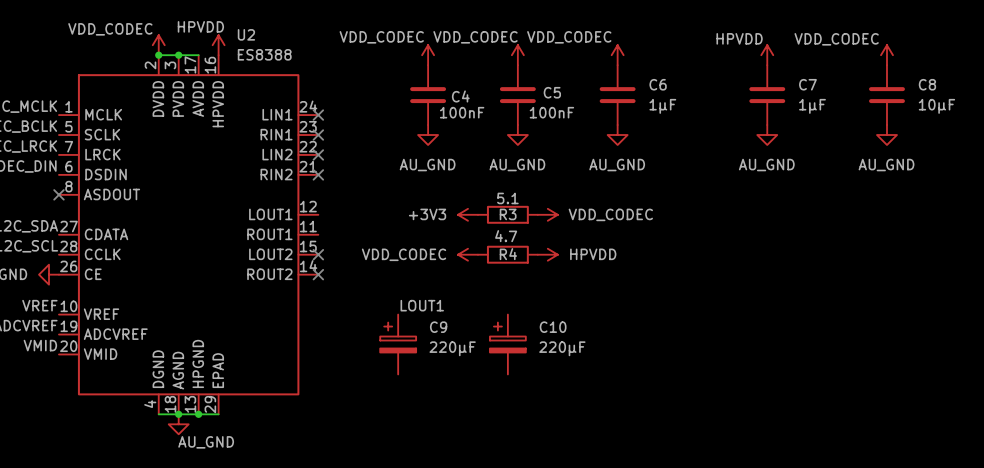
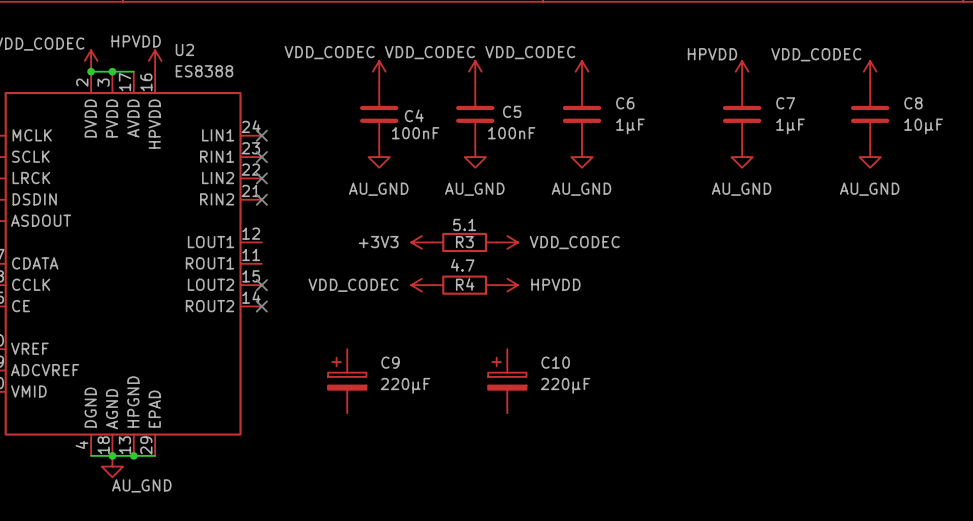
label: LOUT1 (422, 305) -> none
C10 position: (507, 344) -> (507, 381)

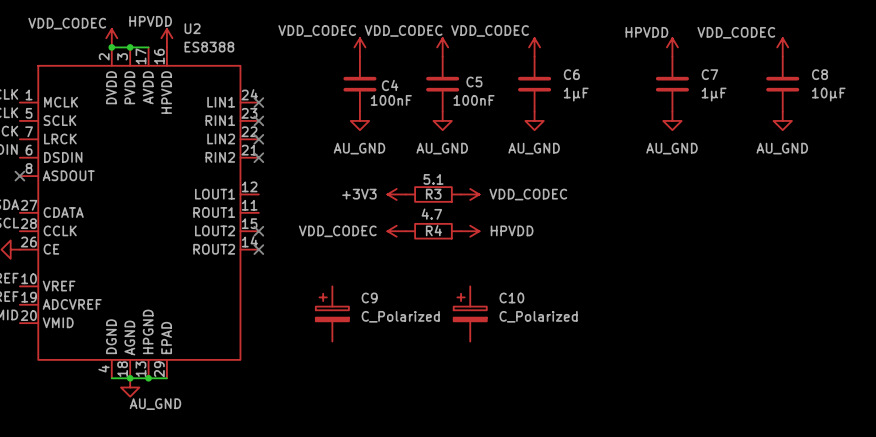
C9 value: 220μF (405, 385) -> C_Polarized (400, 316)
C10 value: 220μF (565, 385) -> C_Polarized (538, 316)

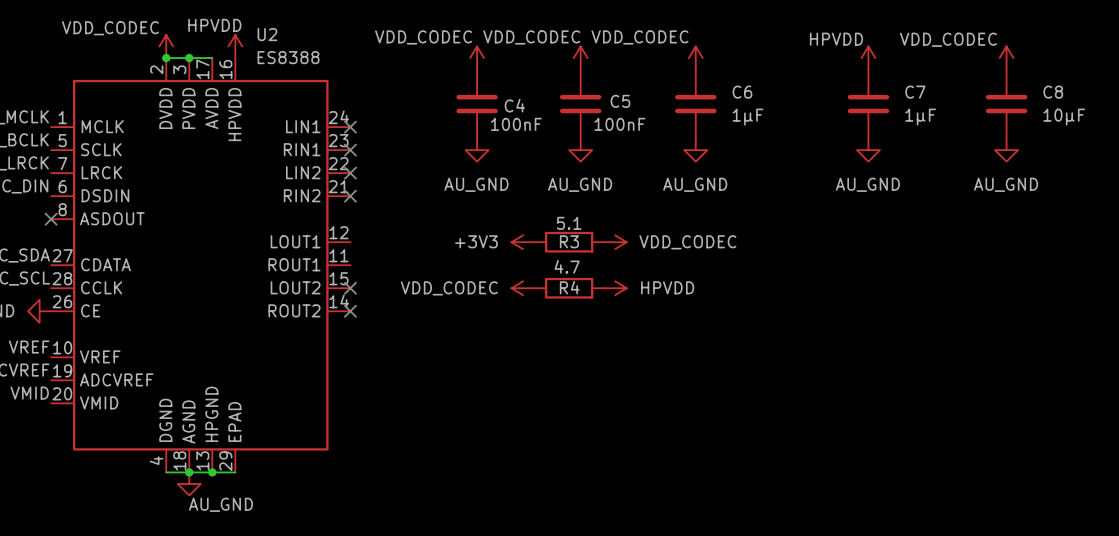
C9: C_Polarized (332, 313) -> none
C10: C_Polarized (470, 313) -> none

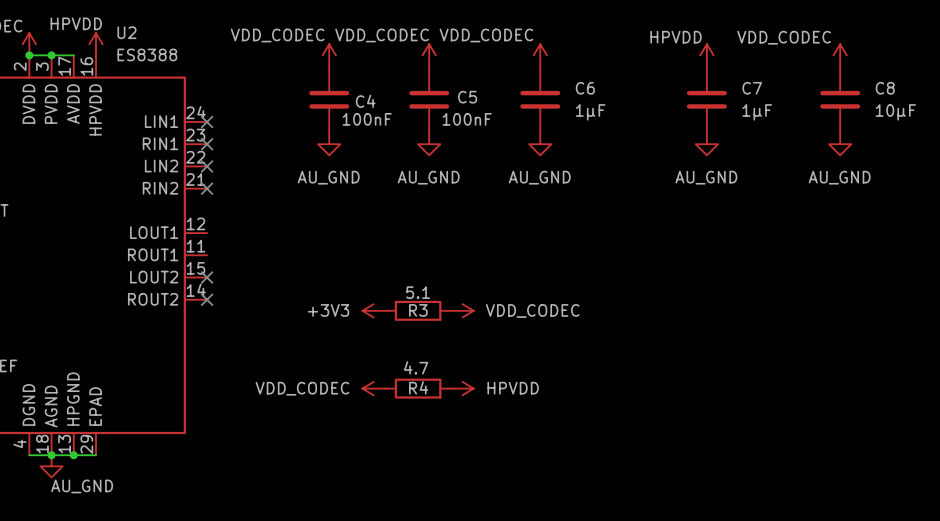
power symbol position: +3V3 (523, 242) -> +3V3 (373, 310)
R3 position: (569, 242) -> (418, 310)
power symbol: VDD_CODEC (615, 242) -> none
power symbol: VDD_CODEC (523, 288) -> none
R4 position: (569, 288) -> (418, 388)
power symbol position: HPVDD (615, 288) -> HPVDD (462, 388)
power symbol: none -> VDD_CODEC (462, 310)
power symbol: none -> VDD_CODEC (373, 388)

